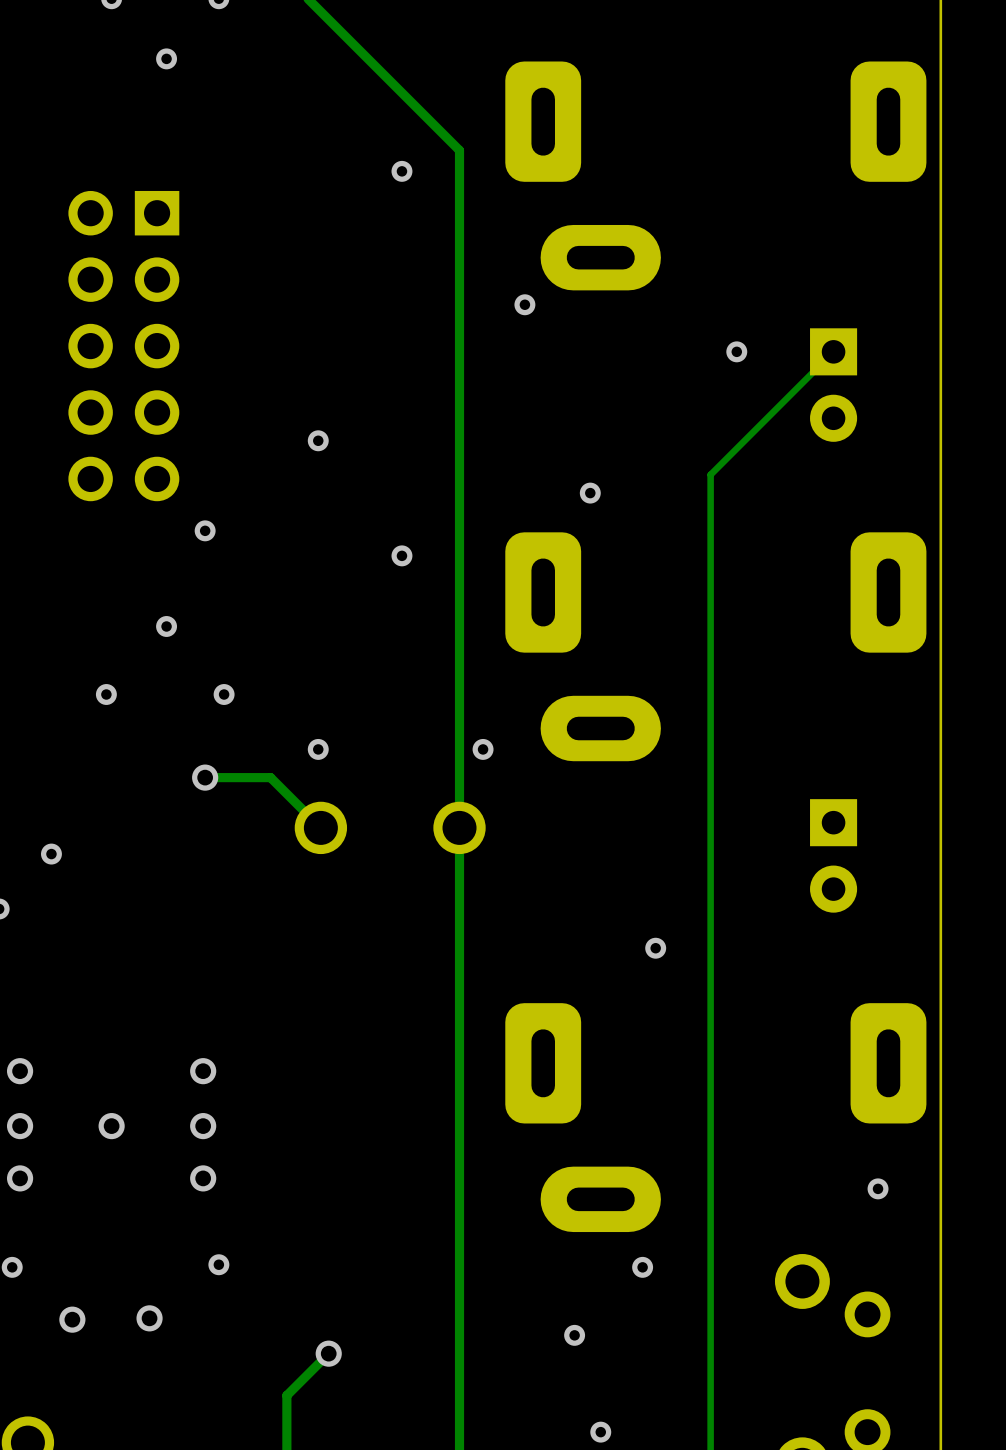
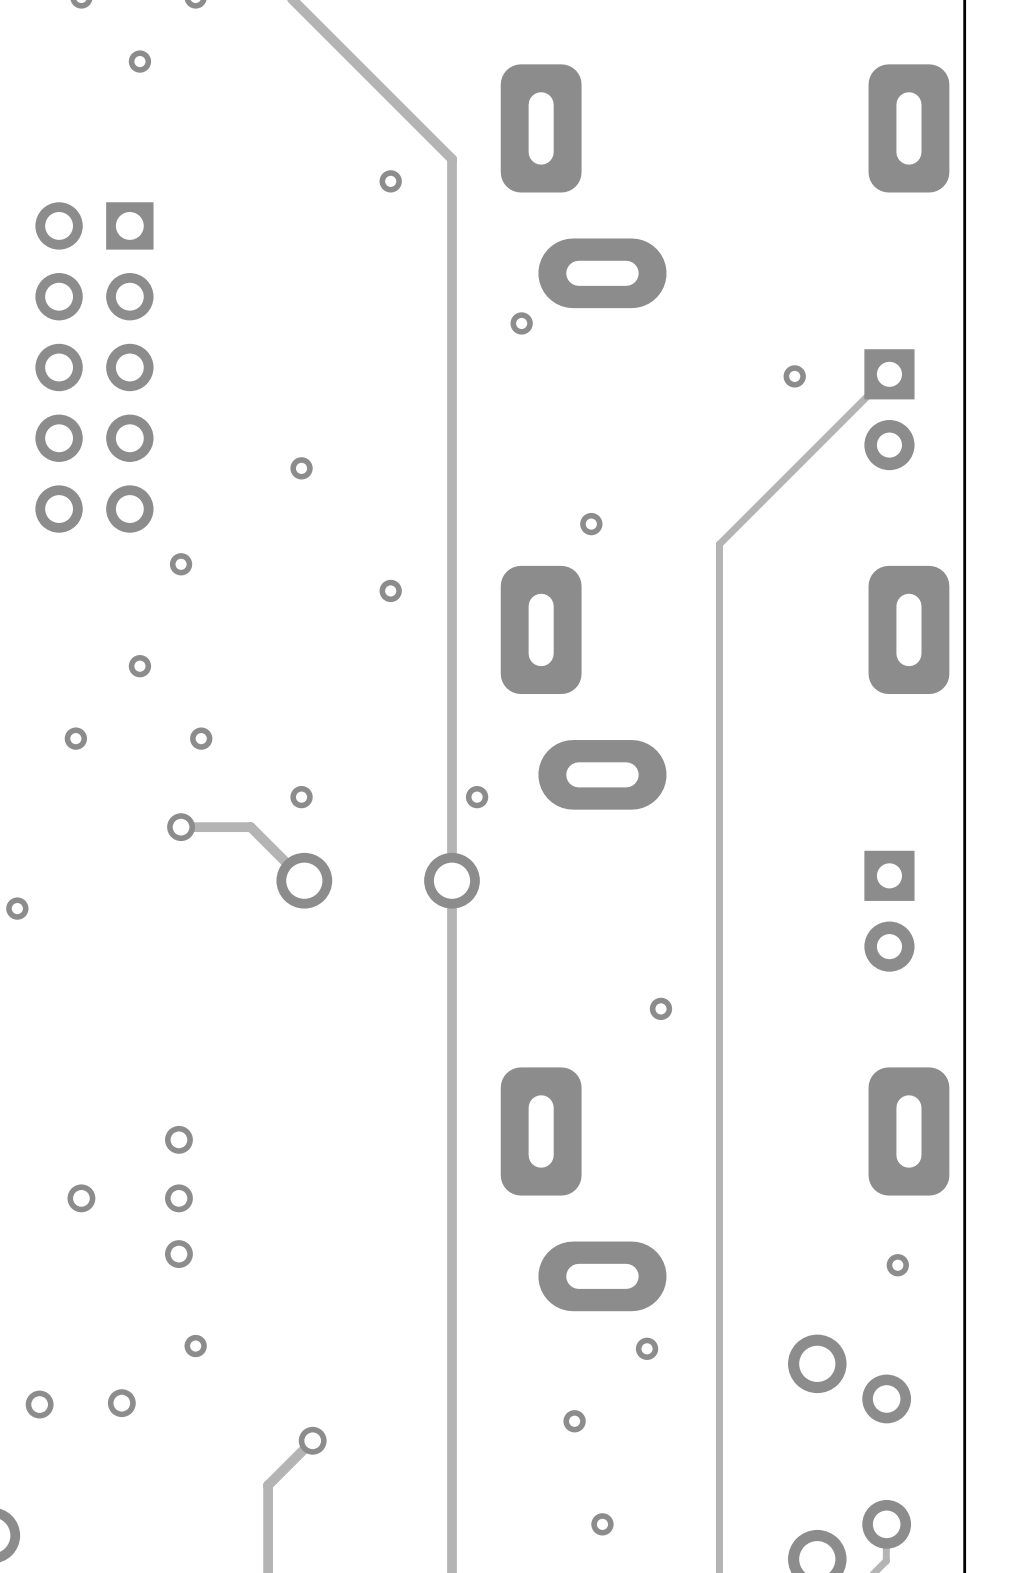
via position: (736, 351) -> (794, 376)
track: (833, 351) (710, 474) (710, 512) -> (889, 374) (719, 544)
part position: (833, 385) -> (889, 409)
part position: (833, 855) -> (889, 911)

